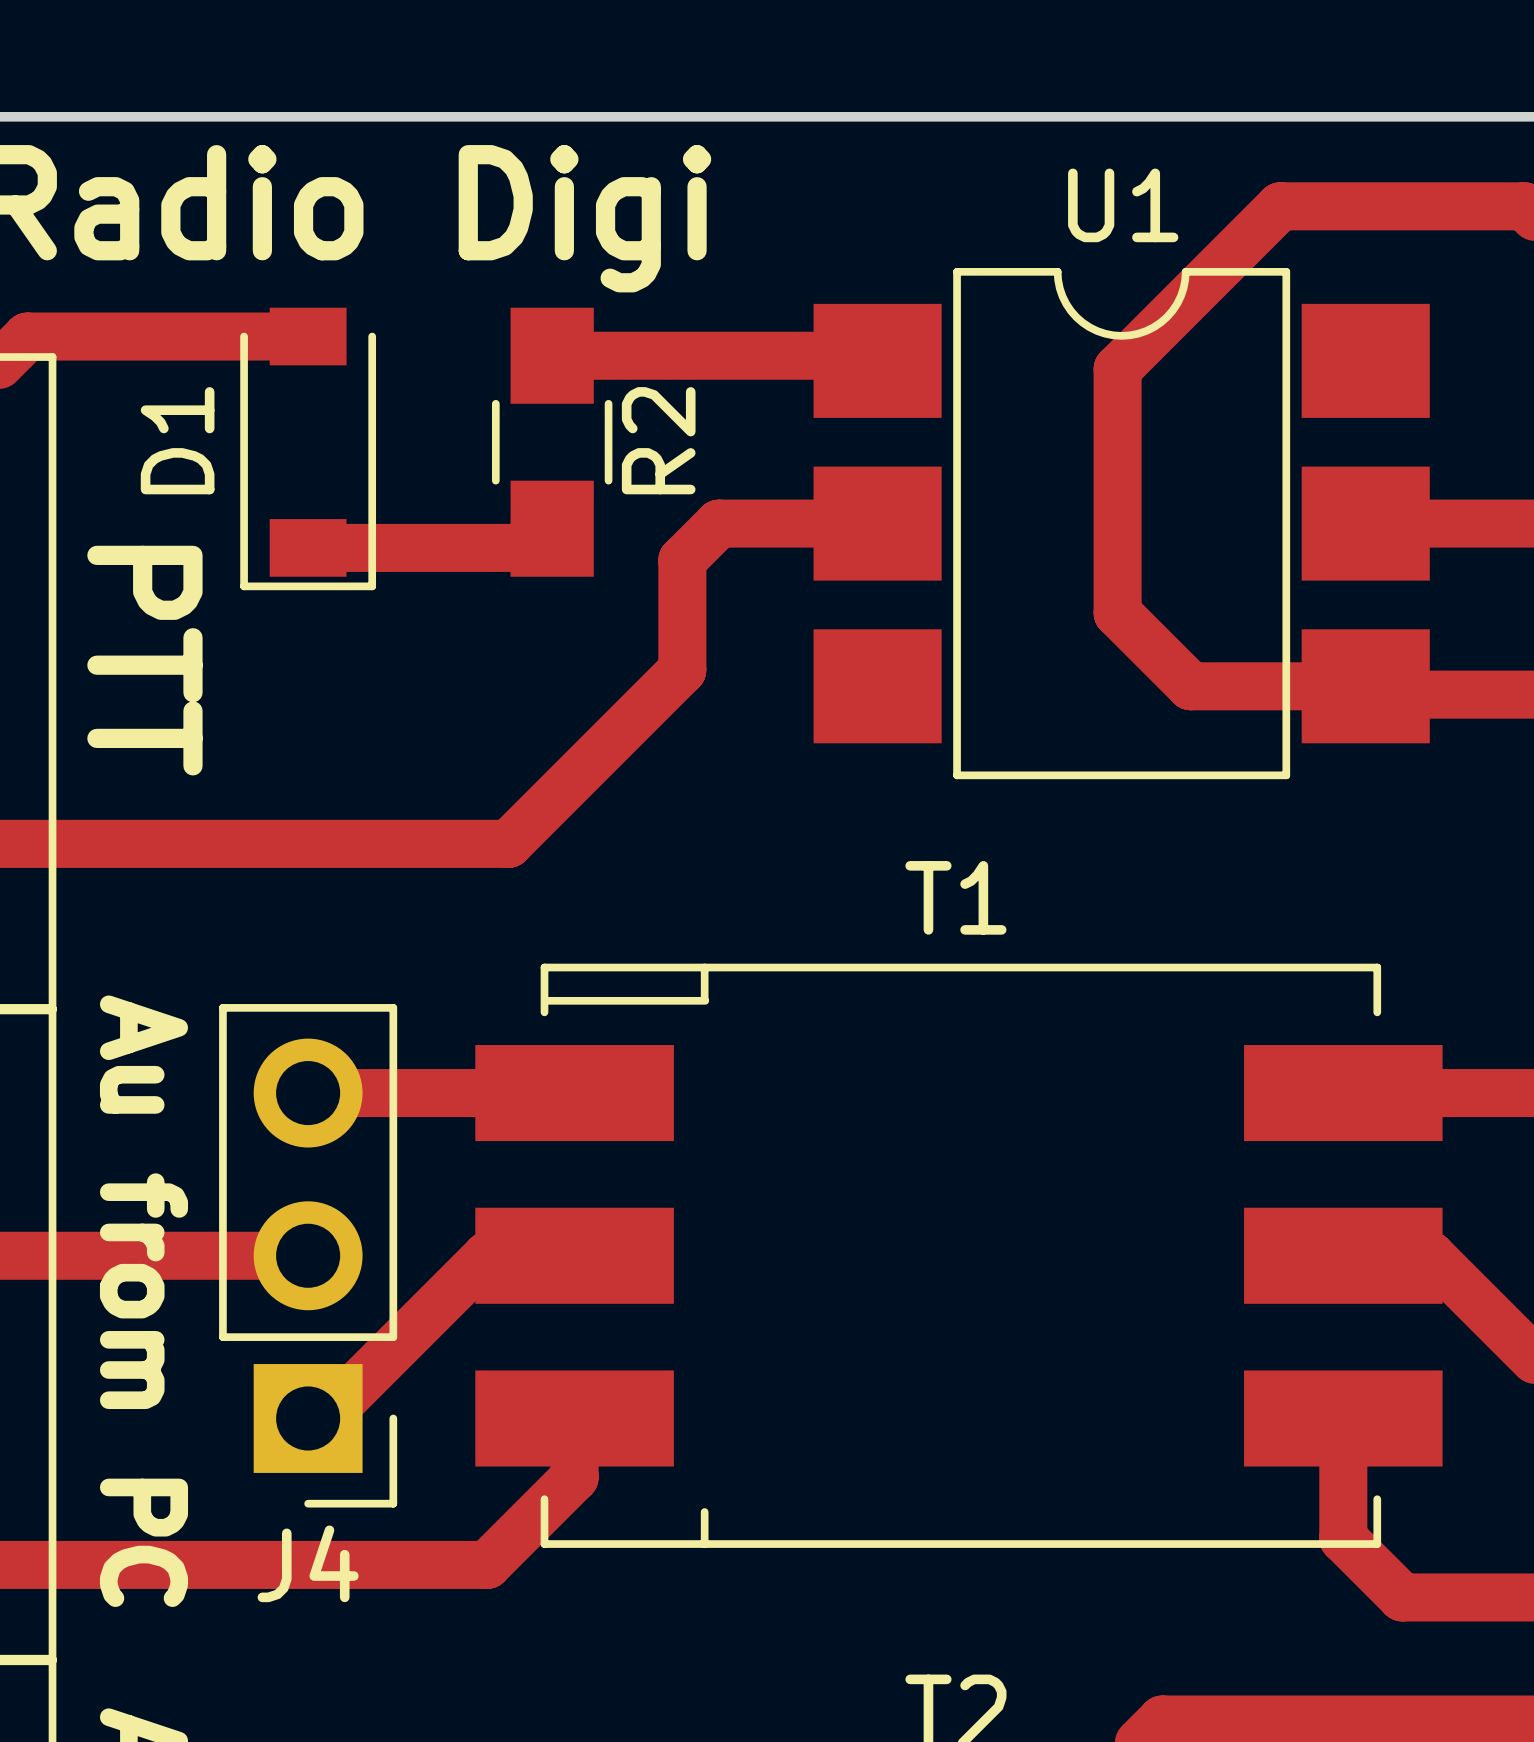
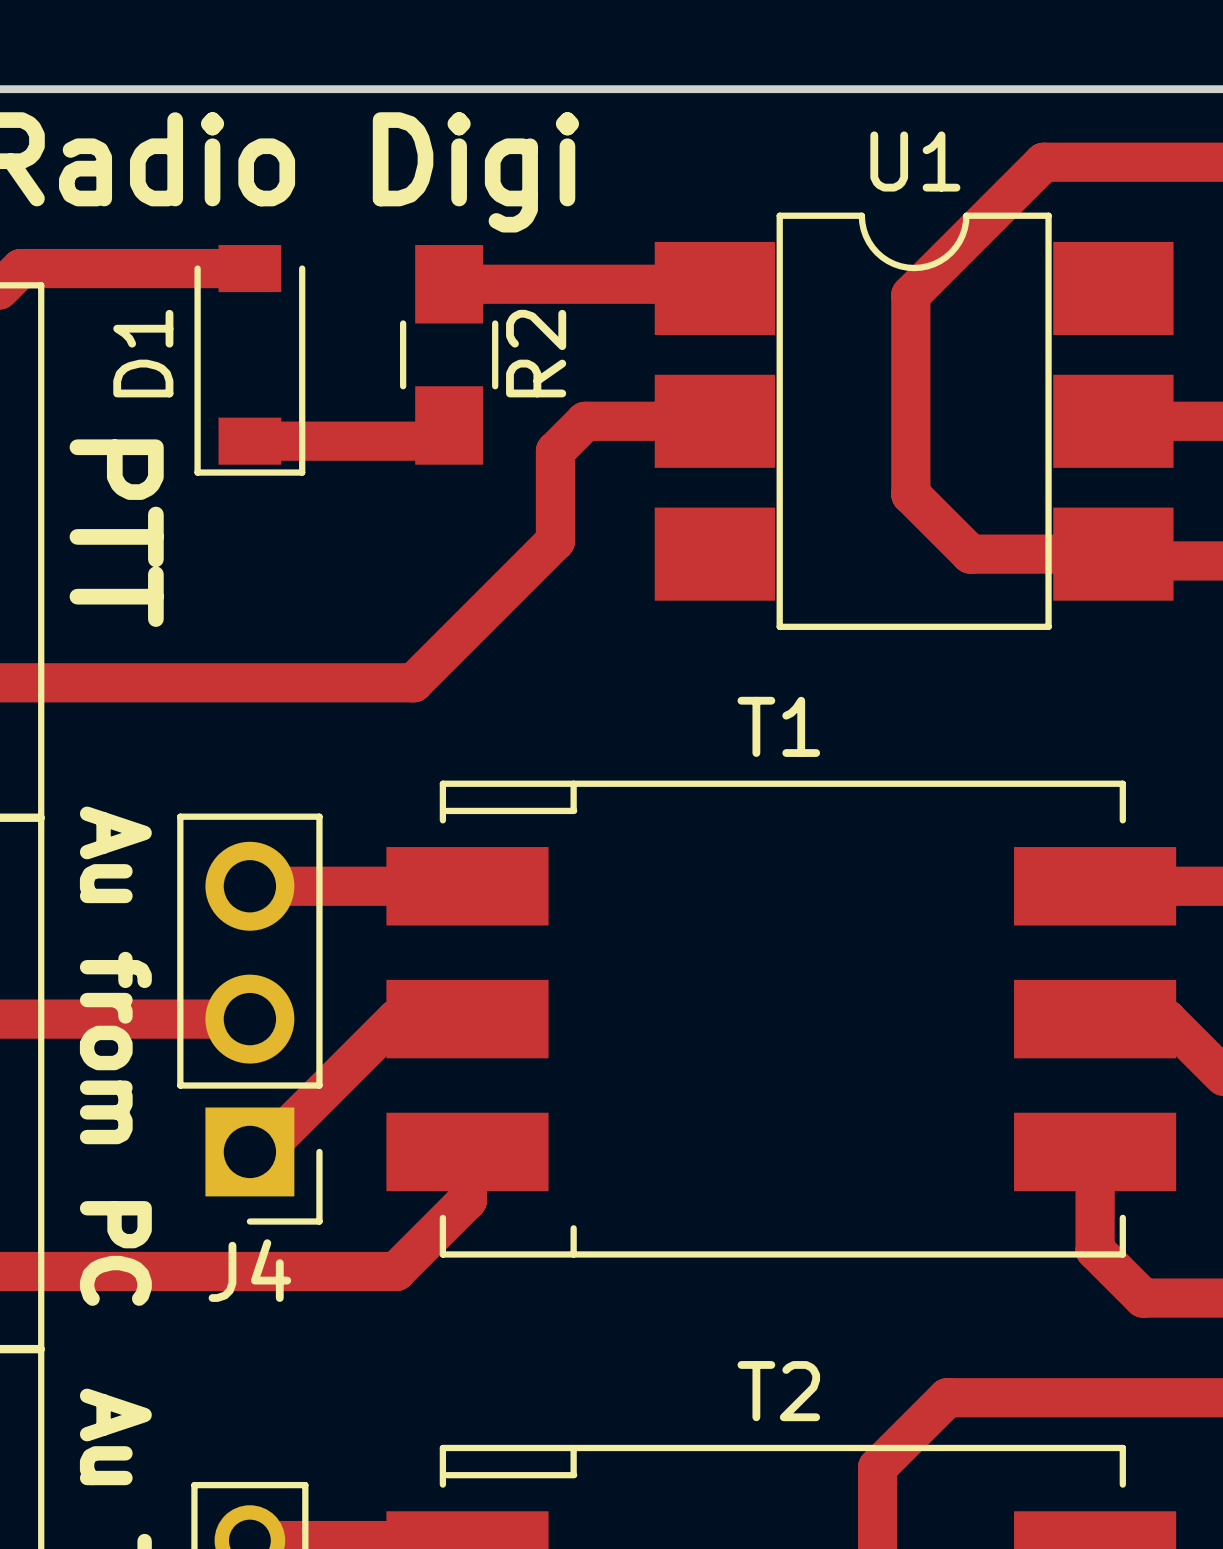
U1 footprint: [813, 267, 1430, 780] -> [654, 212, 1174, 630]

